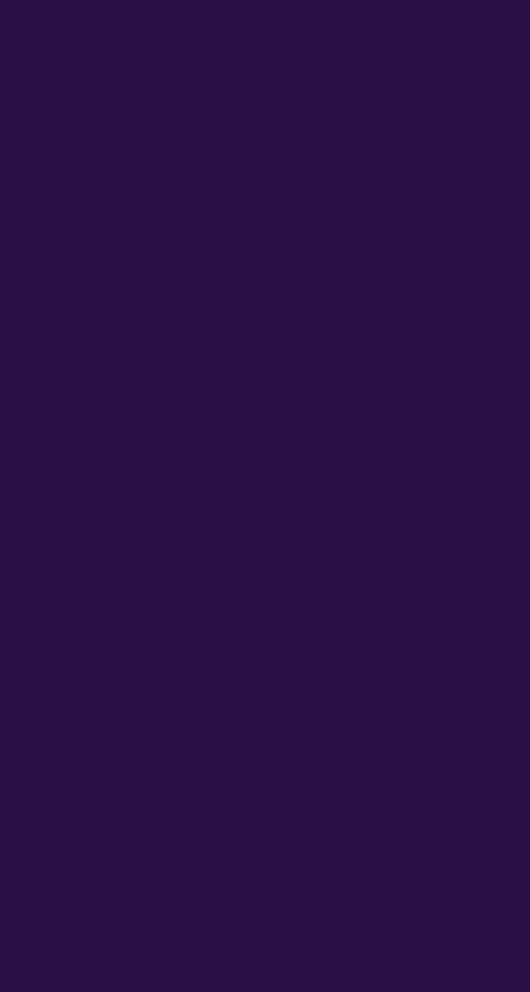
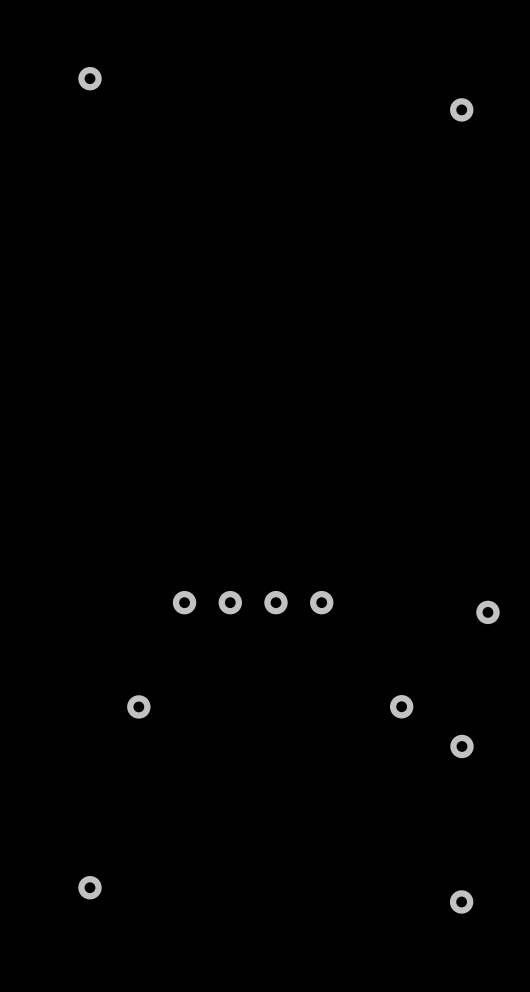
via: none -> (90, 78)
via: none -> (461, 109)
via: none -> (184, 602)
via: none -> (230, 602)
via: none -> (275, 602)
via: none -> (321, 602)
via: none -> (487, 612)
via: none -> (138, 706)
via: none -> (401, 706)
via: none -> (461, 746)
via: none -> (89, 887)
via: none -> (461, 901)

